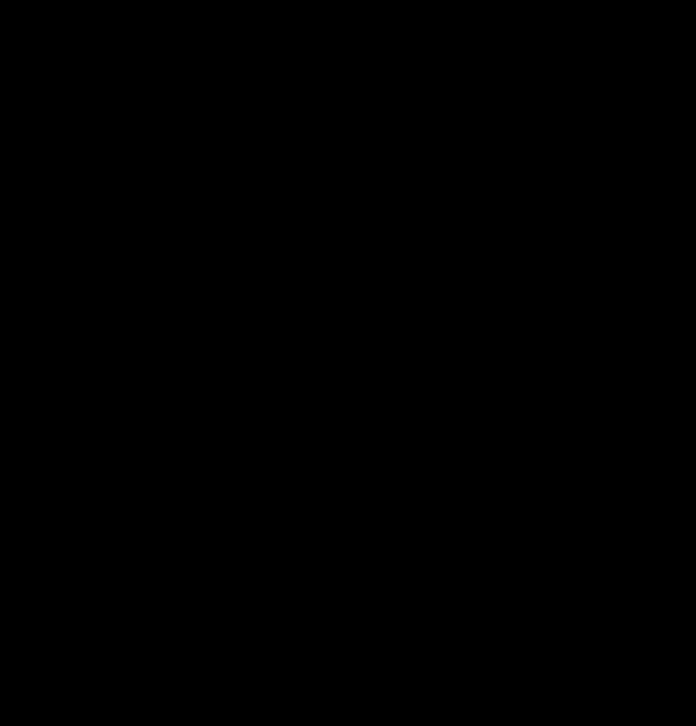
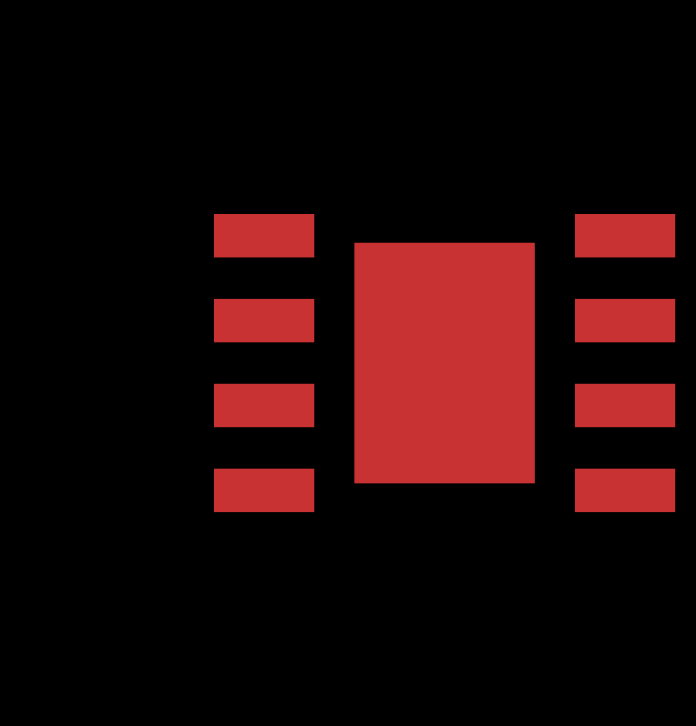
part: none -> (444, 363)

